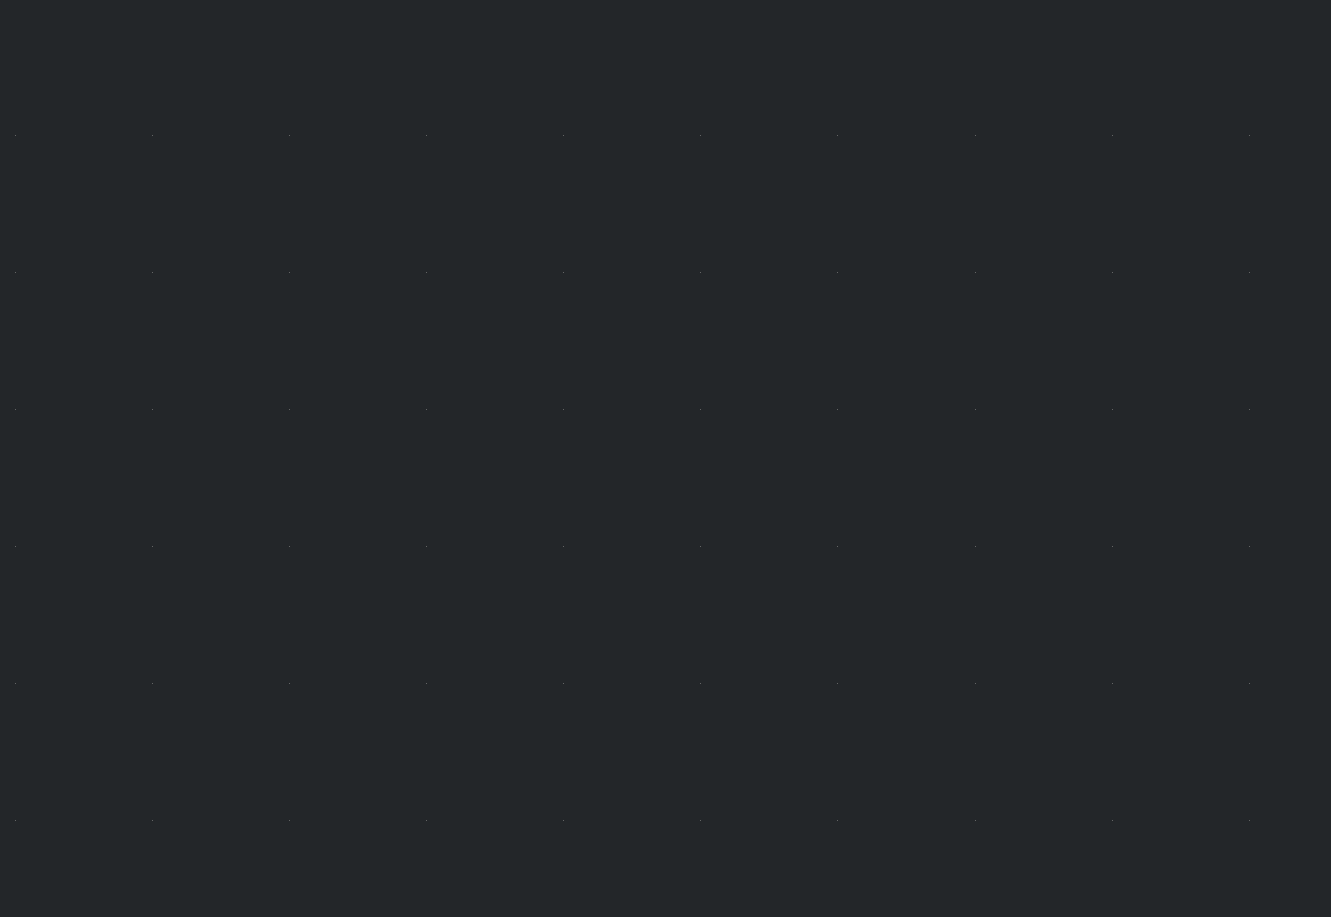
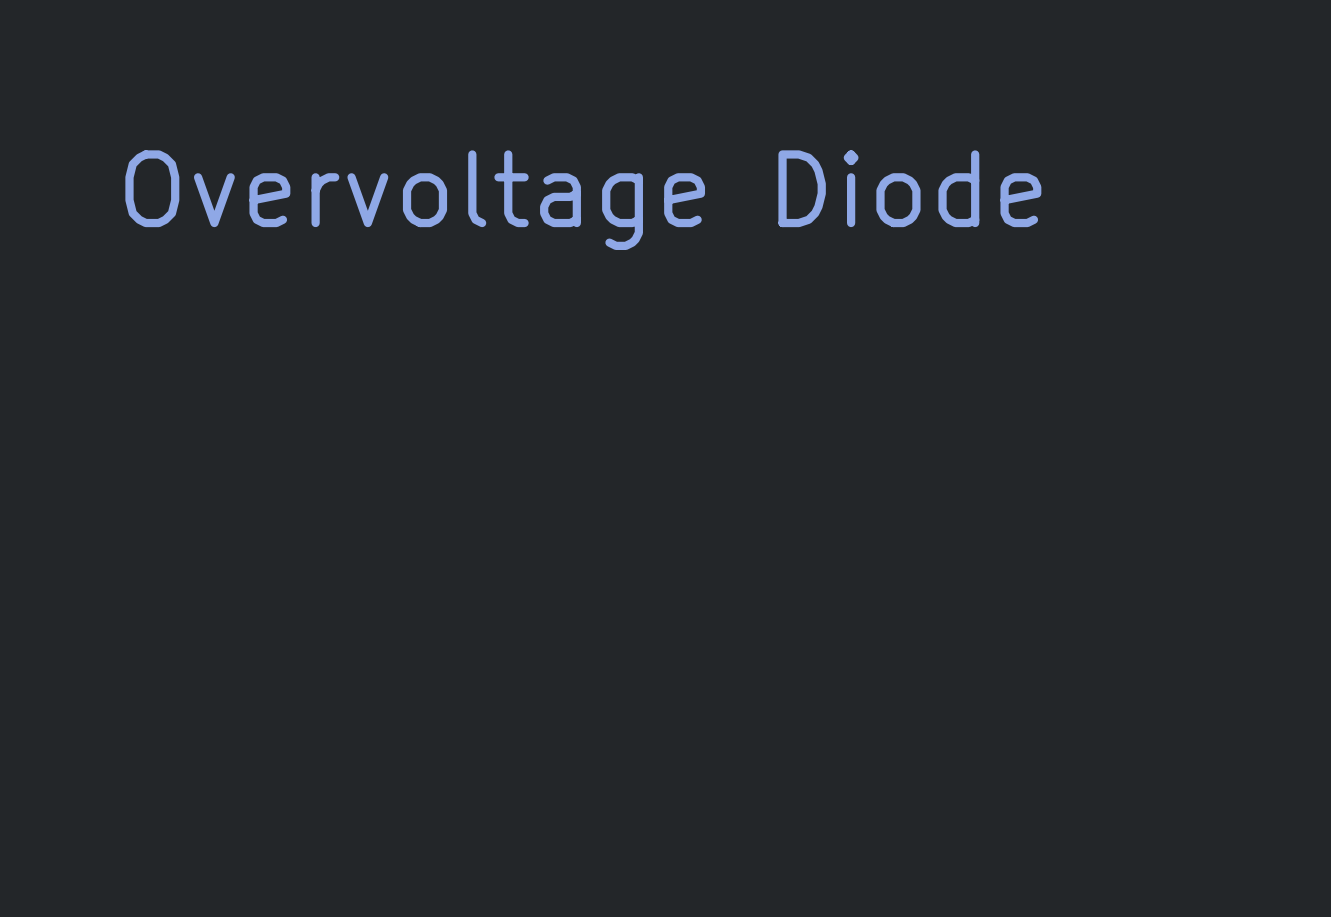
text: none -> Overvoltage Diode (583, 200)

